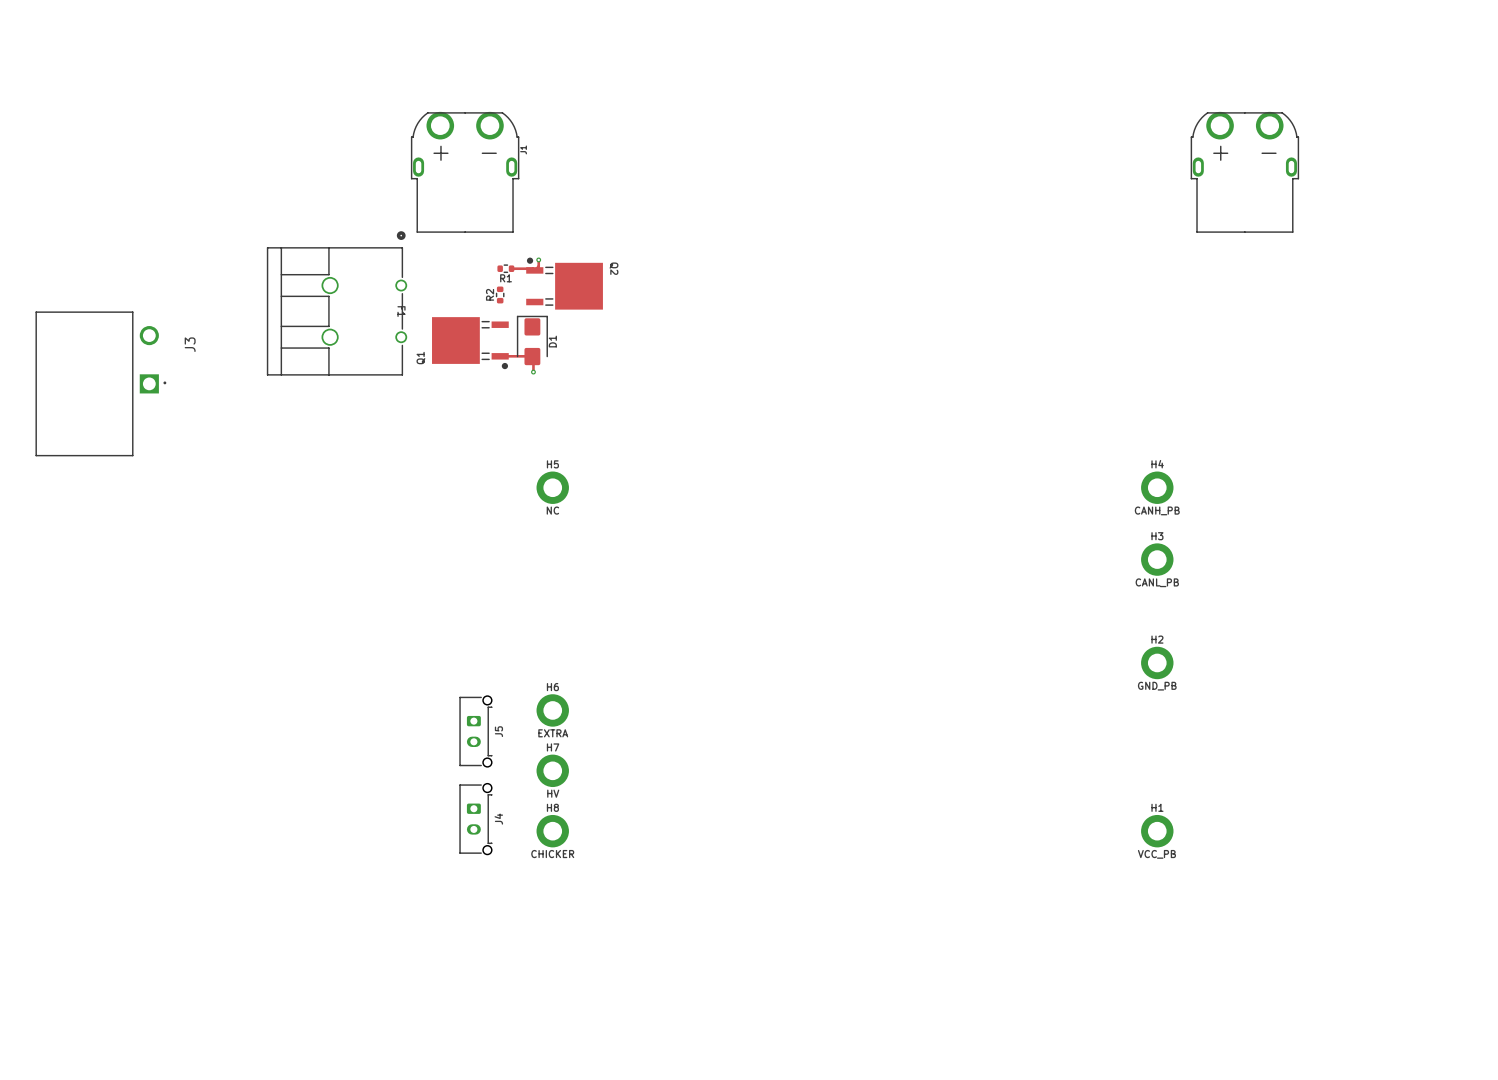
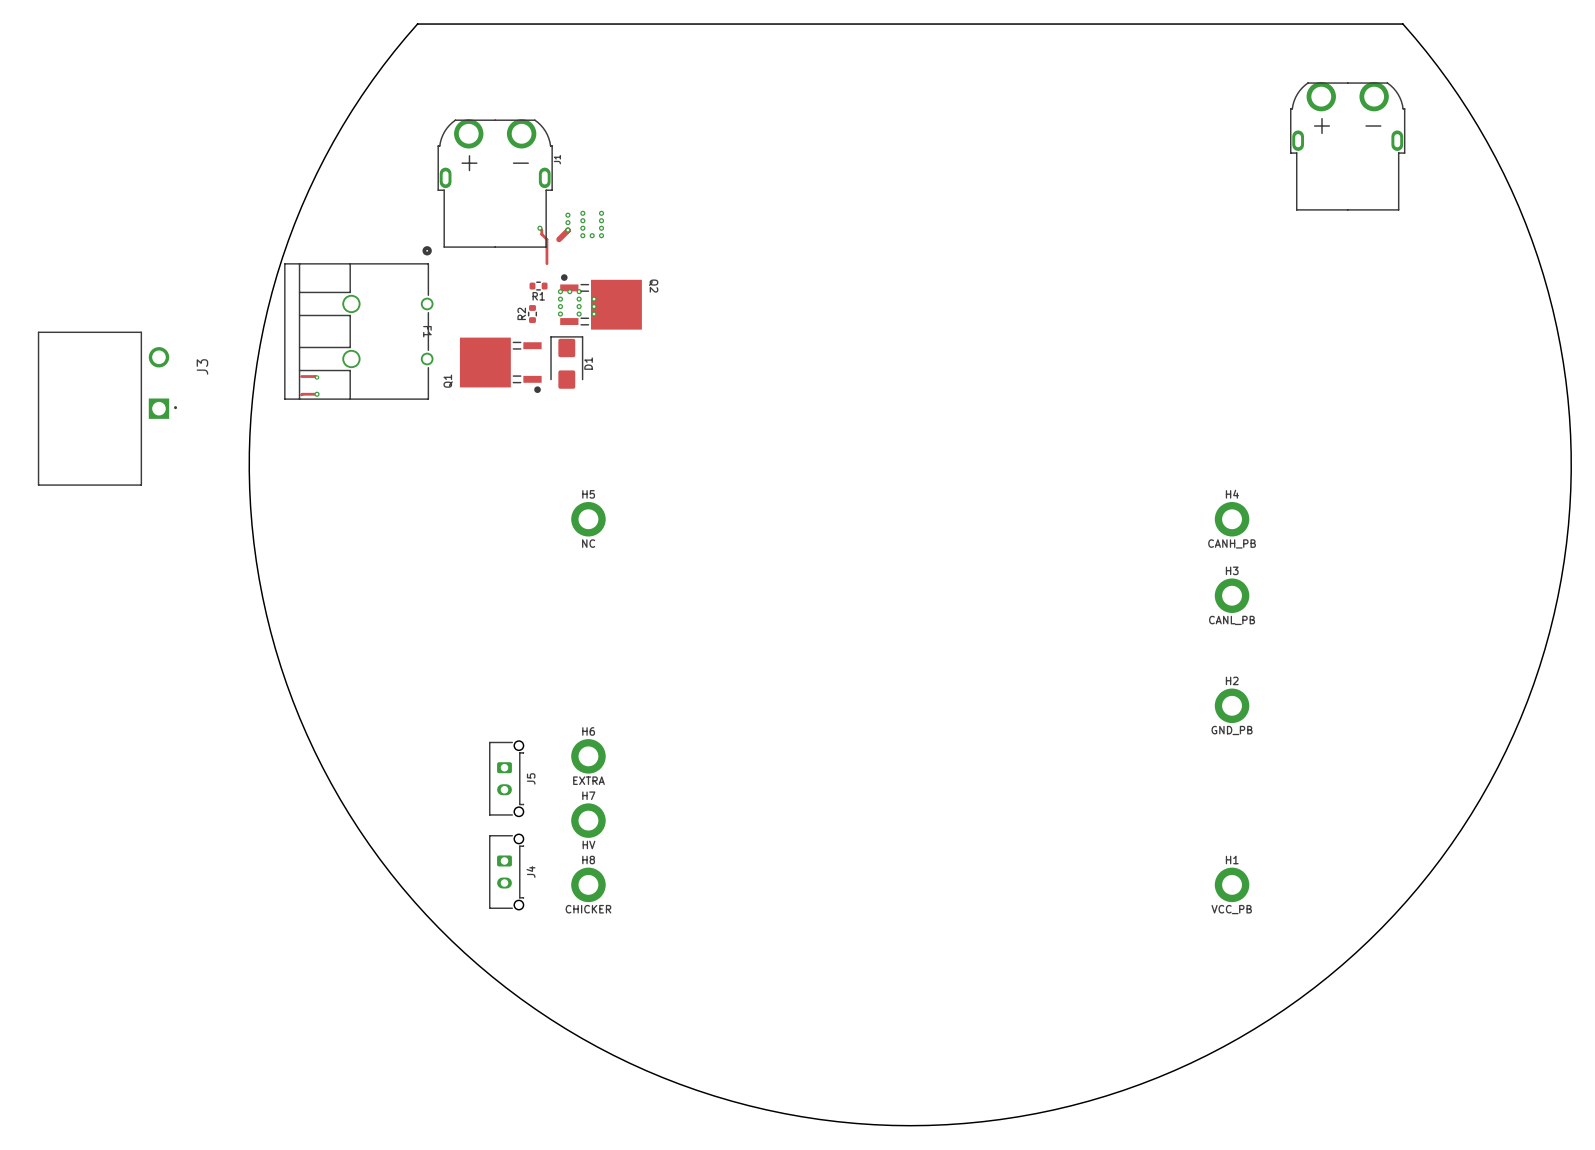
board edge: none -> (417, 24) (1402, 24) (1448, 80) (1477, 125) (1511, 190) (1532, 240) (1548, 292) (1560, 345) (1567, 398) (1571, 471) (1566, 543) (1557, 596) (1544, 649) (1527, 701) (1506, 750) (1480, 798) (1440, 859) (1406, 901) (1368, 940) (1314, 987) (1269, 1019) (1207, 1055) (1140, 1084) (1071, 1105) (1018, 1116) (946, 1124) (892, 1125) (820, 1119) (766, 1109) (696, 1090) (646, 1070) (581, 1038) (535, 1009) (478, 965) (426, 914) (379, 859) (339, 798) (314, 750) (286, 684) (270, 632) (256, 561) (250, 507) (249, 434) (254, 380) (263, 327) (282, 257) (309, 190) (342, 125) (383, 65) (417, 24)
part position: (1244, 172) -> (1347, 146)
via: none -> (582, 213)
via: none -> (601, 213)
via: none -> (567, 215)
via: none -> (582, 220)
via: none -> (601, 220)
via: none -> (567, 222)
track: none -> (539, 228) (541, 234) (546, 239) (546, 263)
via: none -> (539, 228)
via: none -> (582, 228)
via: none -> (601, 228)
track: none -> (567, 230) (559, 239)
via: none -> (567, 230)
via: none -> (582, 235)
via: none -> (592, 235)
via: none -> (601, 235)
track: (538, 259) (538, 266) (534, 270) (533, 268) (511, 268) -> none
via: (538, 259) -> none
via: none -> (560, 291)
via: none -> (569, 291)
via: none -> (579, 291)
via: none -> (560, 299)
via: none -> (579, 299)
via: none -> (594, 299)
via: none -> (560, 306)
via: none -> (579, 306)
via: none -> (594, 306)
via: none -> (560, 314)
via: none -> (579, 314)
via: none -> (594, 314)
track: none -> (301, 376) (317, 377)
via: none -> (317, 377)
track: (500, 356) (532, 356) (533, 372) -> none
track: none -> (317, 394) (301, 394)
via: none -> (317, 394)
via: (533, 372) -> none

